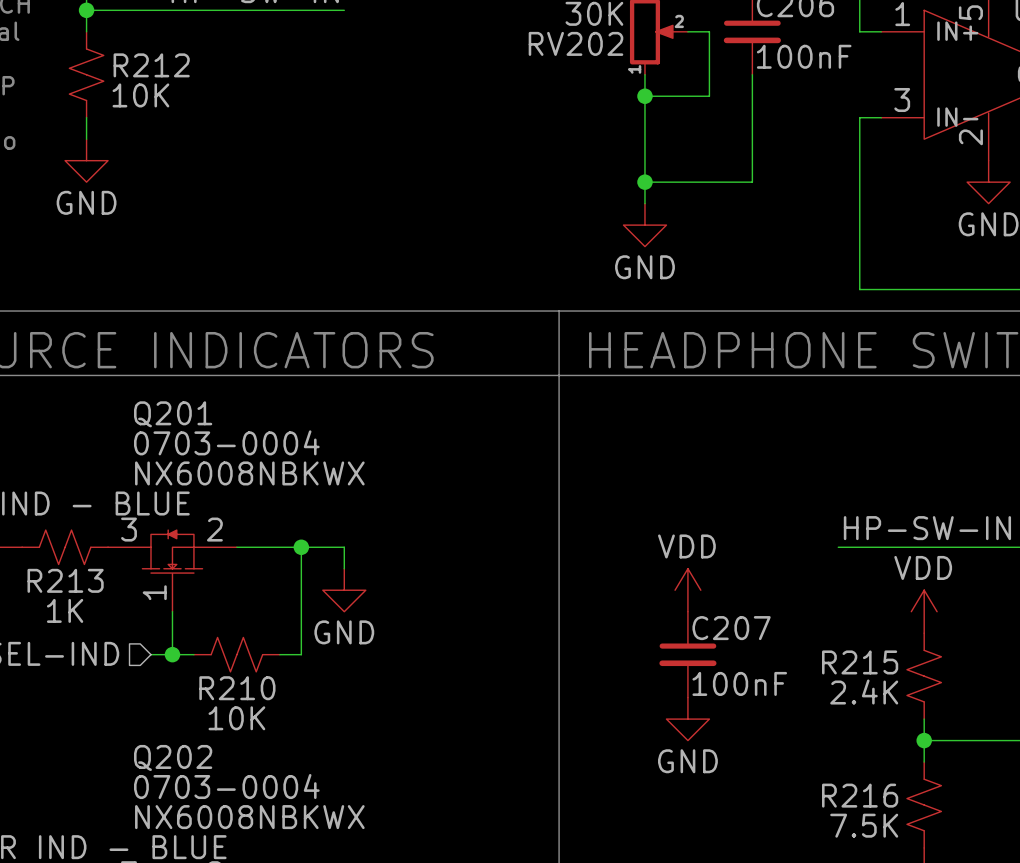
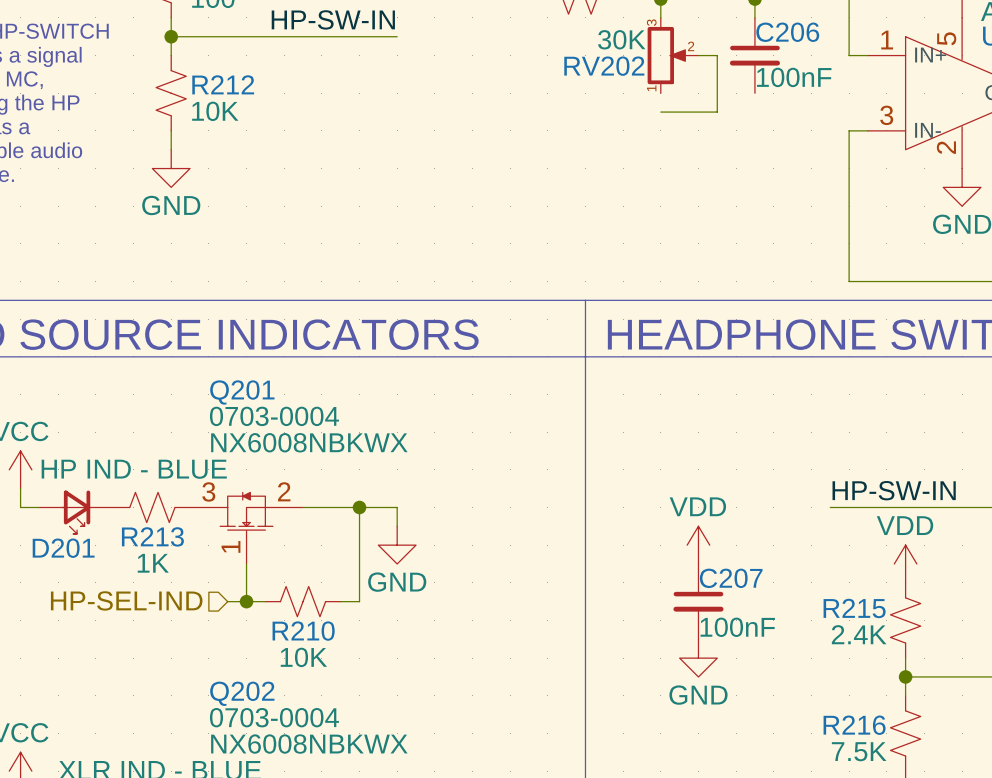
wire: (644, 74) (644, 203) -> none
wire: (752, 74) (752, 182) (644, 182) -> none
junction: (644, 96) -> none
junction: (644, 182) -> none
power symbol: GND (644, 225) -> none

